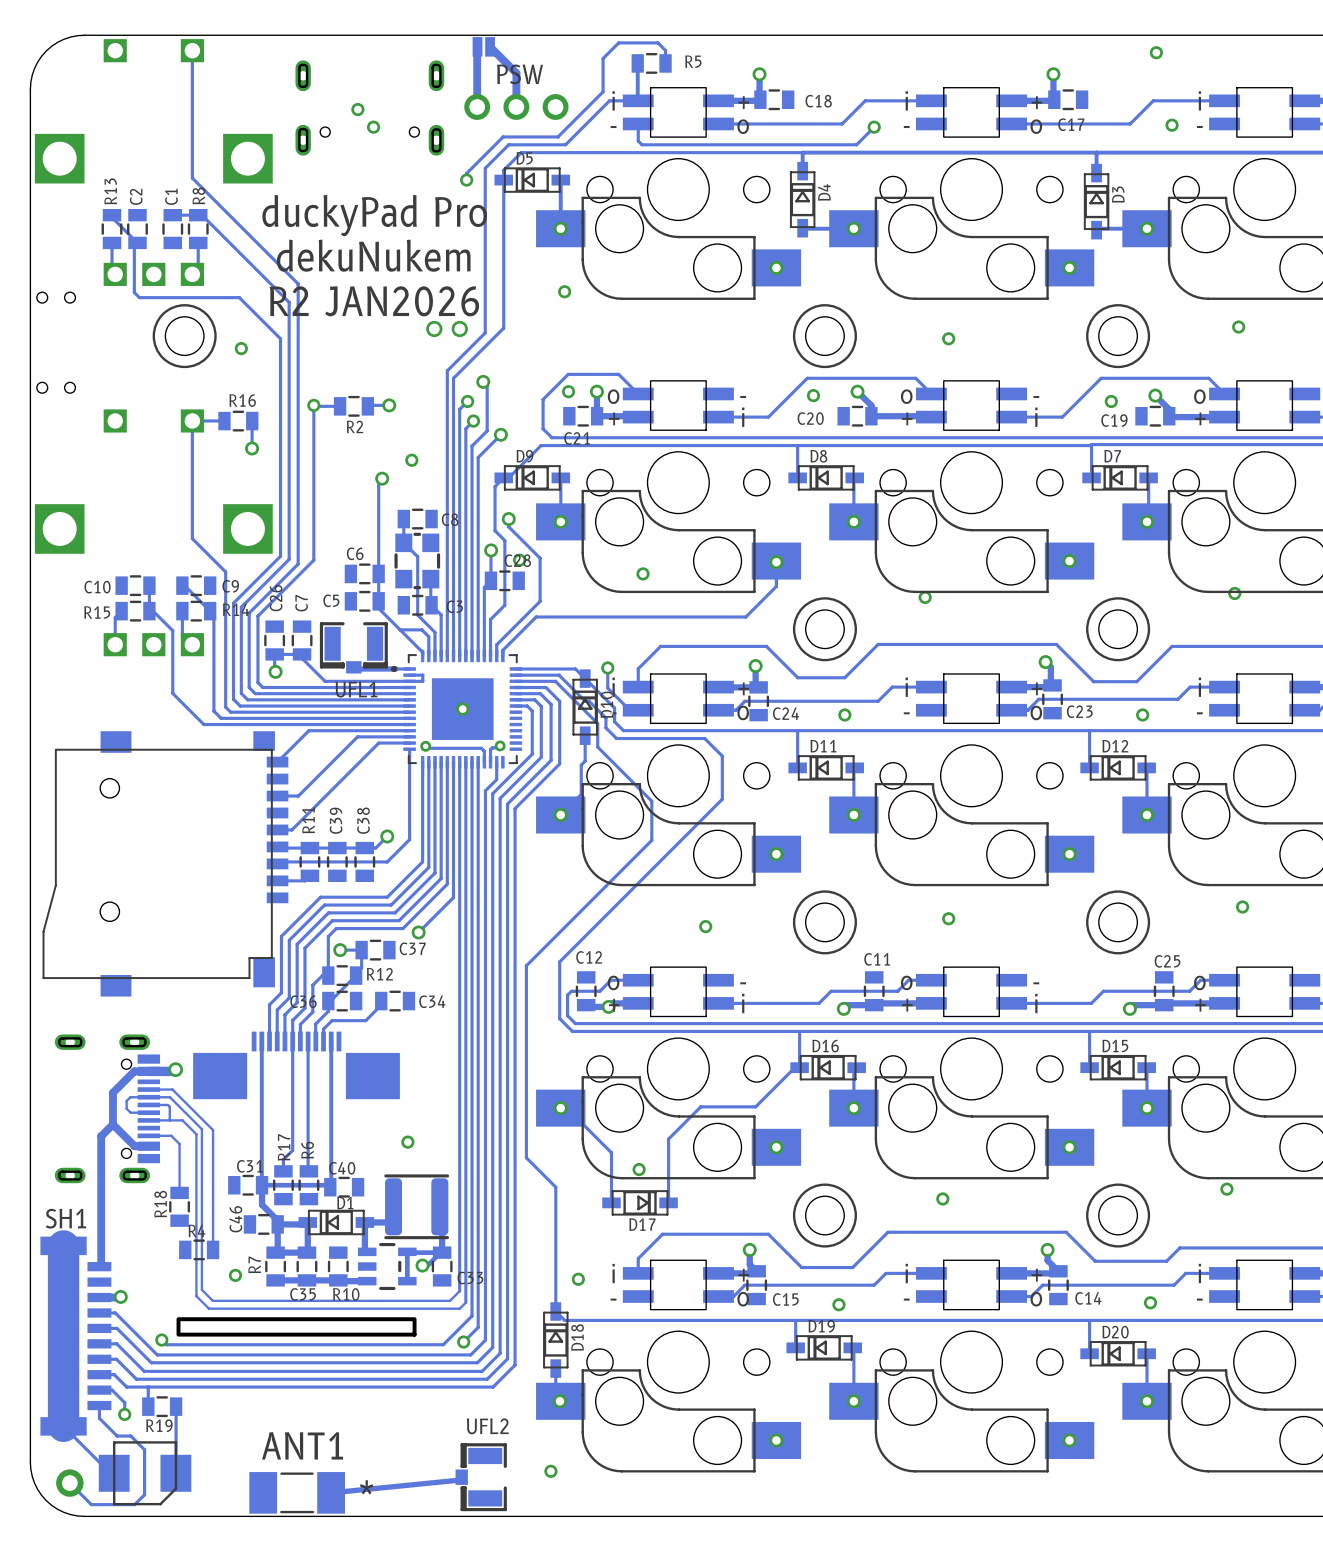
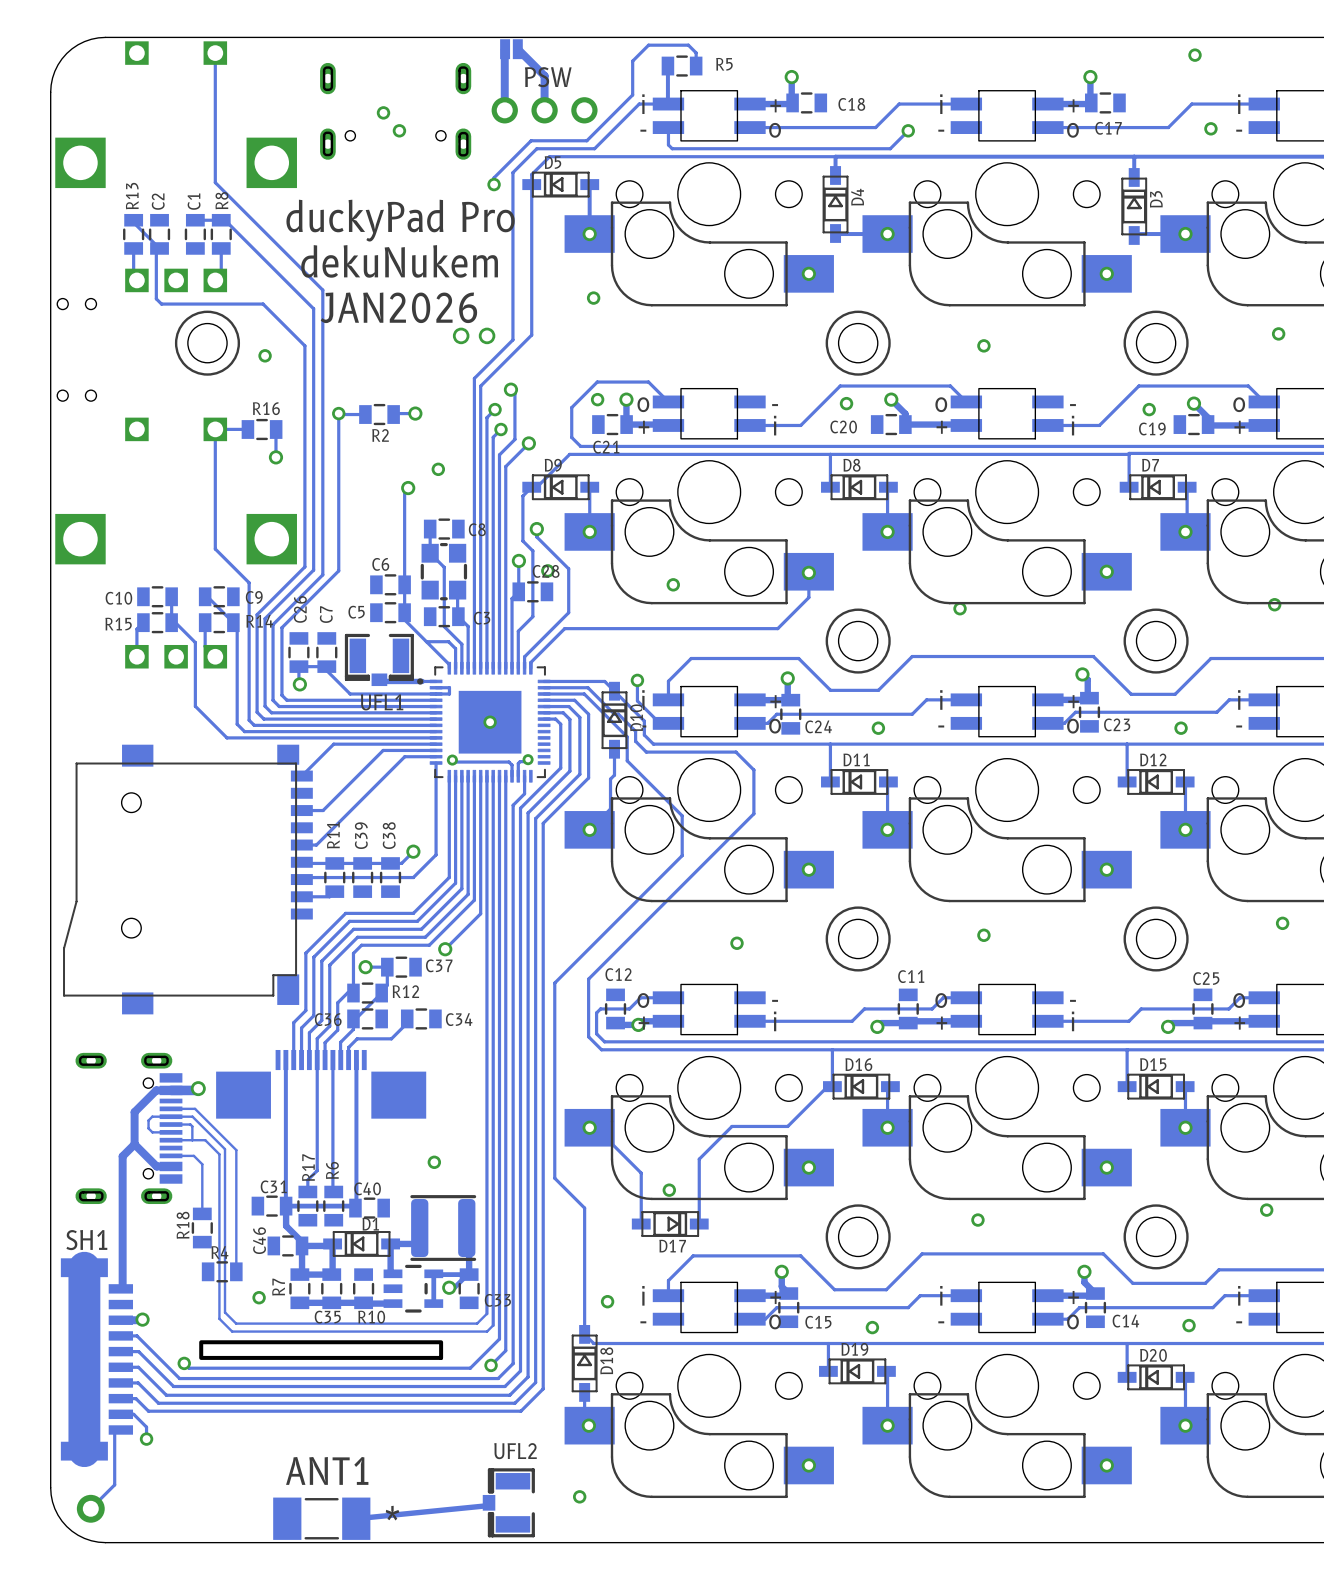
text: R2 JAN2026 (374, 301) -> JAN2026 (398, 307)
track: (148, 1387) (148, 1406) -> none
track: (99, 1405) (99, 1418) (117, 1436) (130, 1436) (144, 1449) (144, 1494) (134, 1504) (91, 1504) (69, 1483) -> (120, 1429) (114, 1429) (114, 1484) (90, 1508)
R19: (162, 1406) -> none
track: (176, 1406) (176, 1473) -> none
track: (63, 1426) (110, 1473) (114, 1473) -> none
part: (145, 1473) -> none

